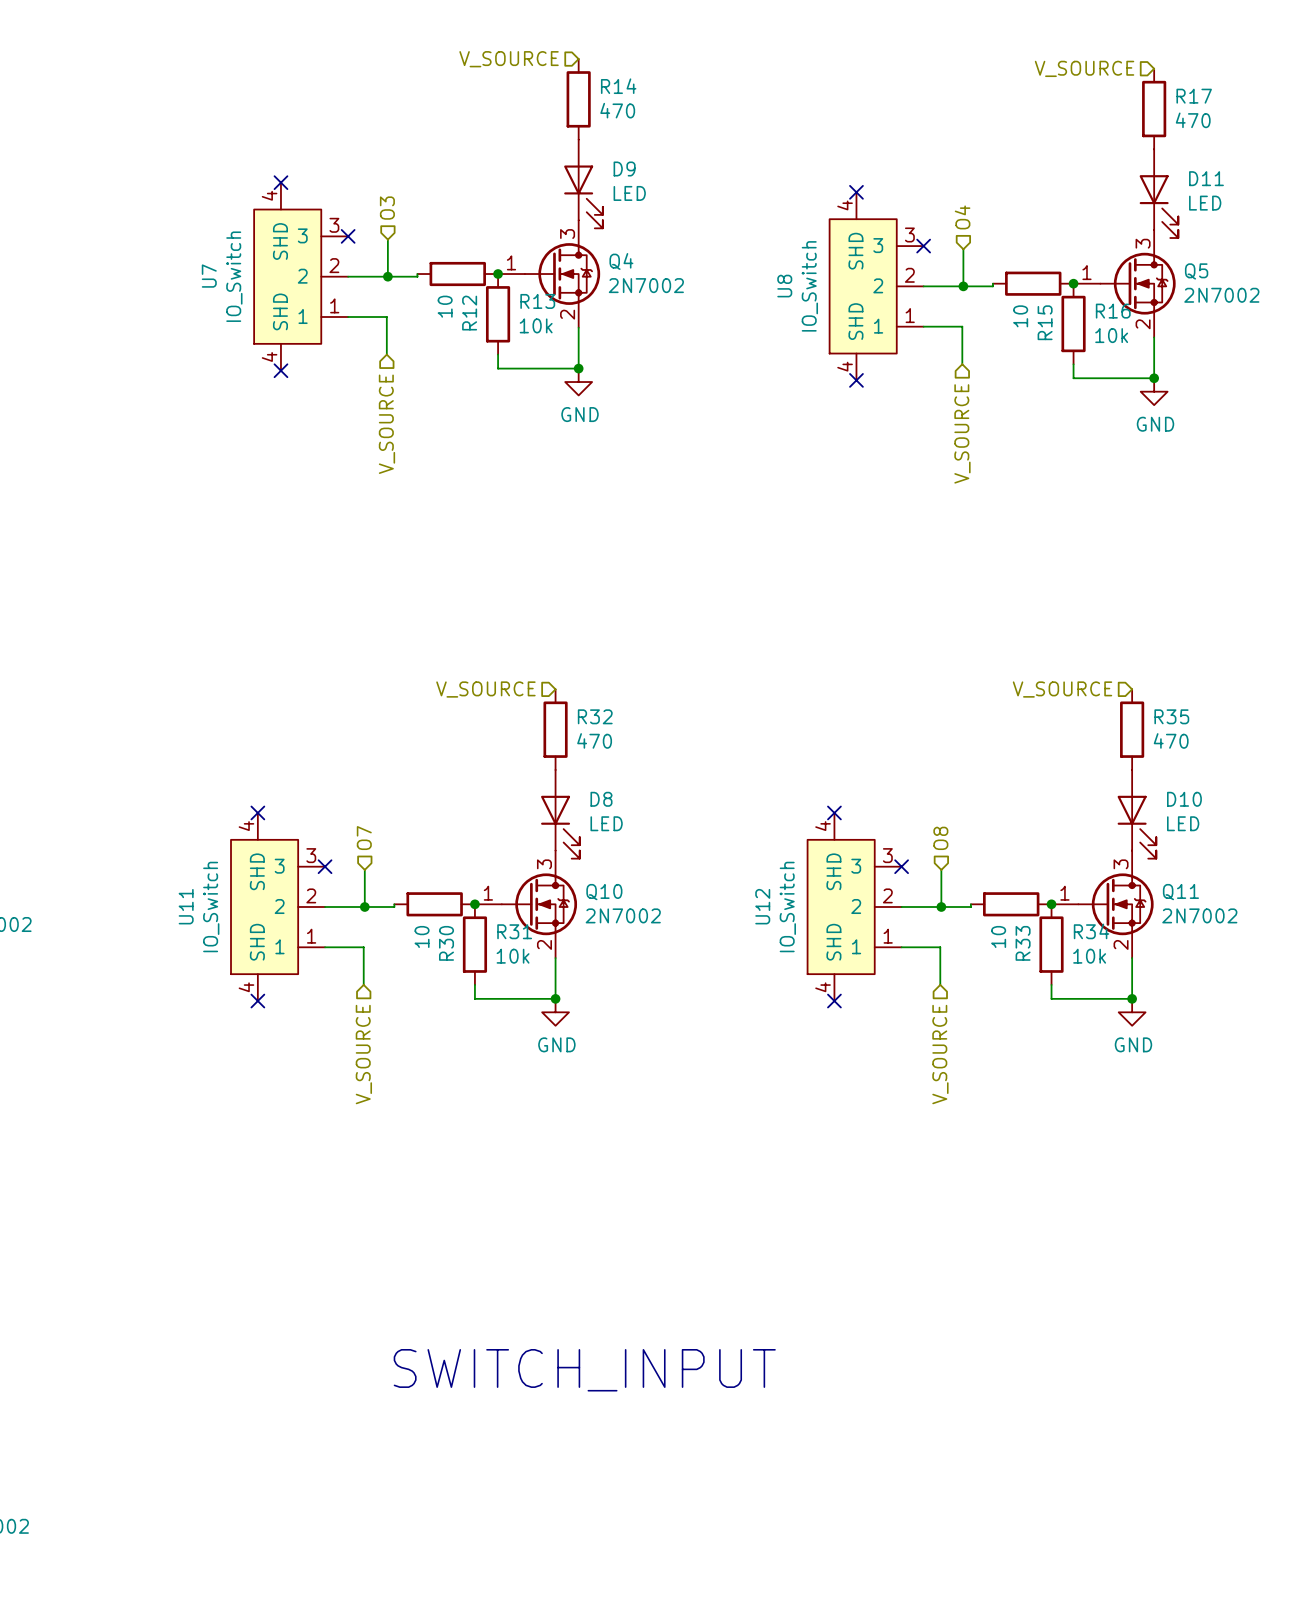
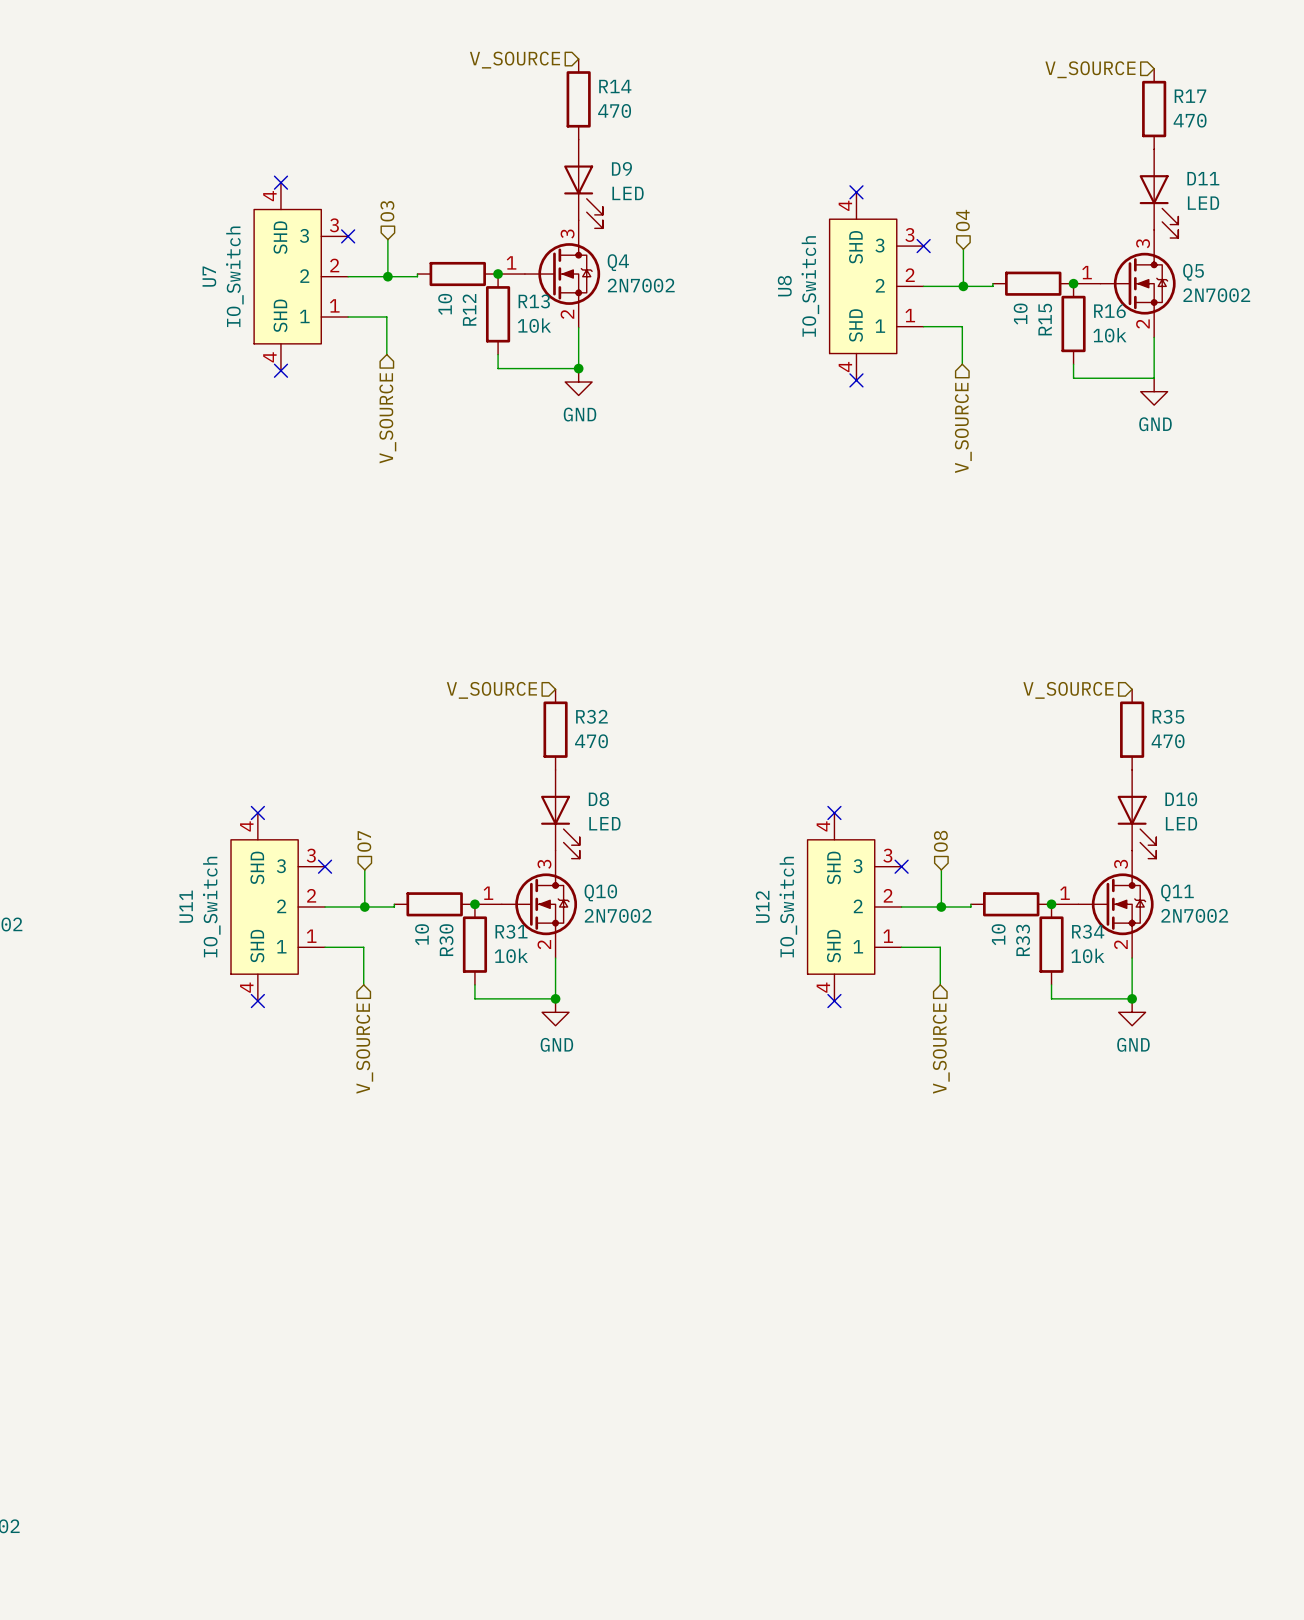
junction: (1154, 378) -> none
text: SWITCH_INPUT (584, 1370) -> none

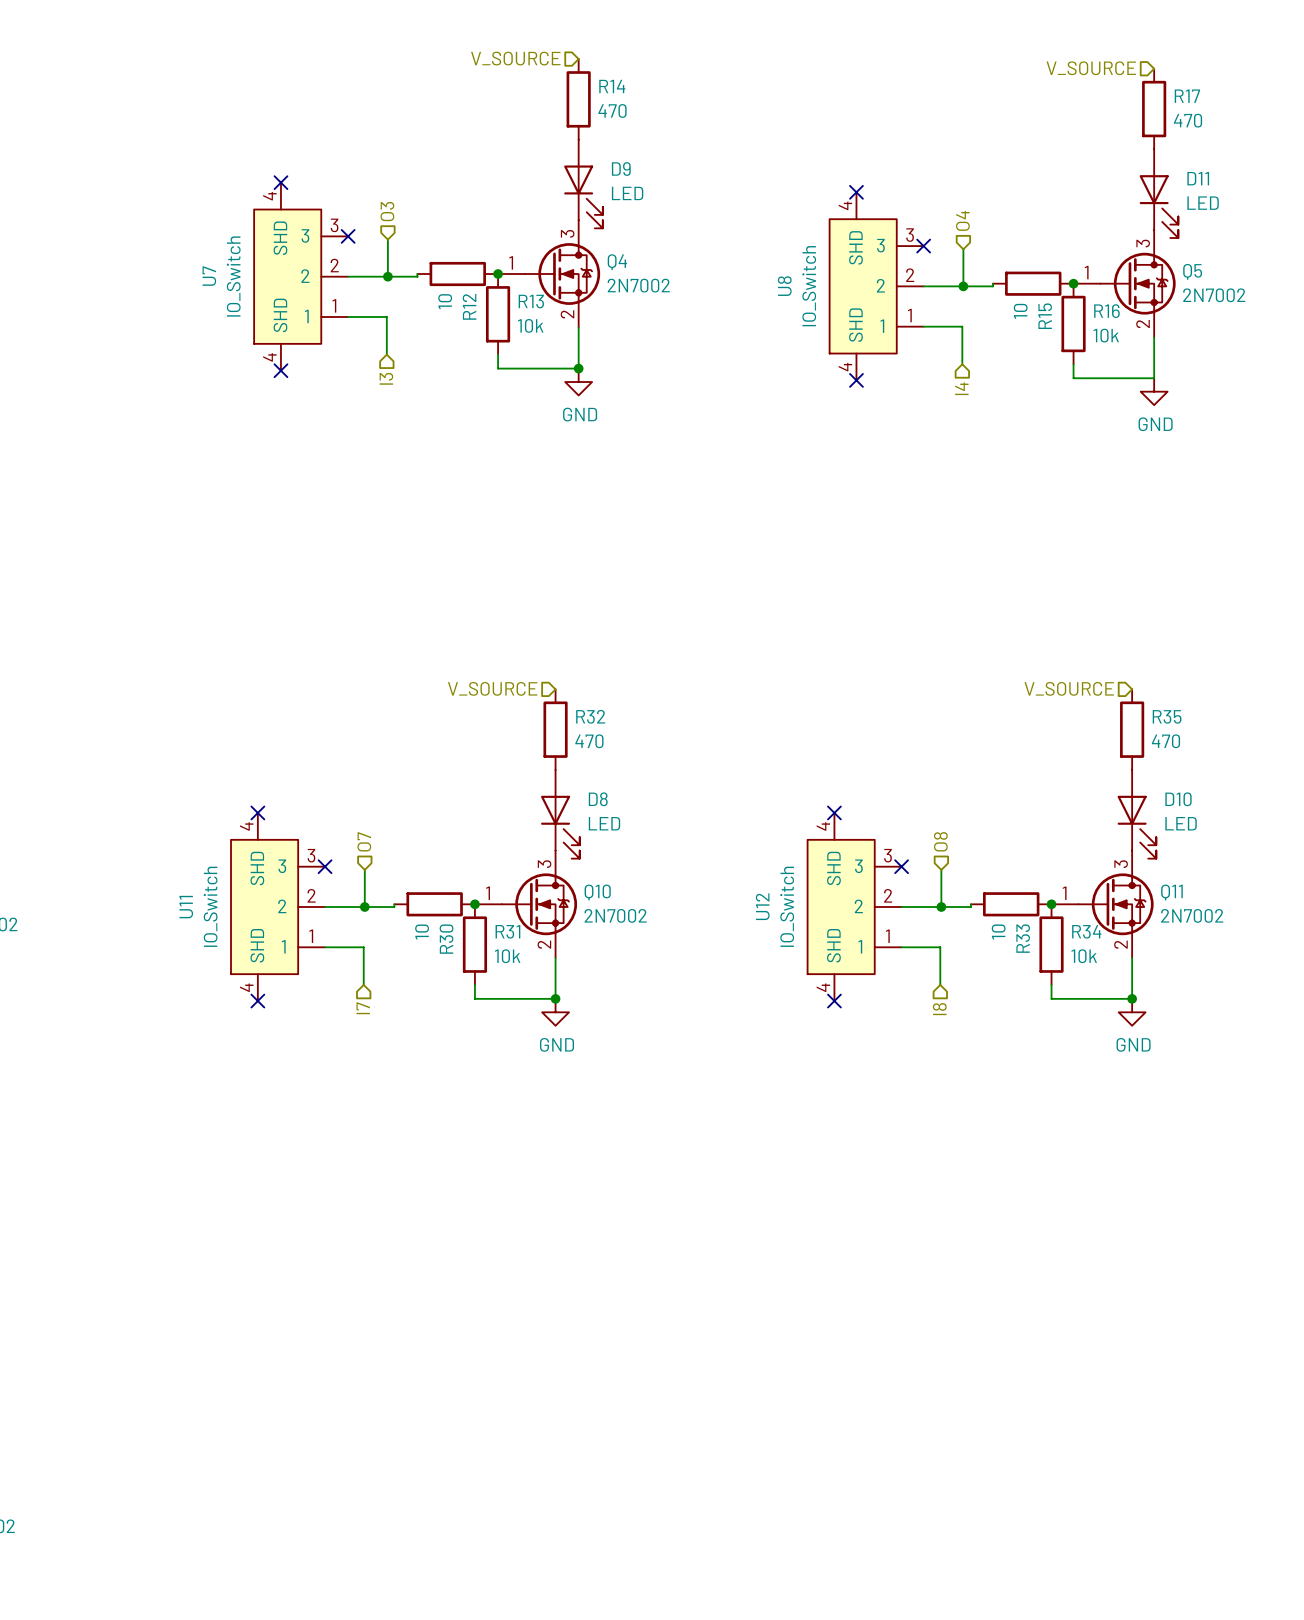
hierarchical label: V_SOURCE (387, 418) -> I3 (386, 378)
hierarchical label: V_SOURCE (963, 427) -> I4 (961, 388)
hierarchical label: V_SOURCE (364, 1048) -> I7 (363, 1008)
hierarchical label: V_SOURCE (941, 1048) -> I8 (939, 1009)

